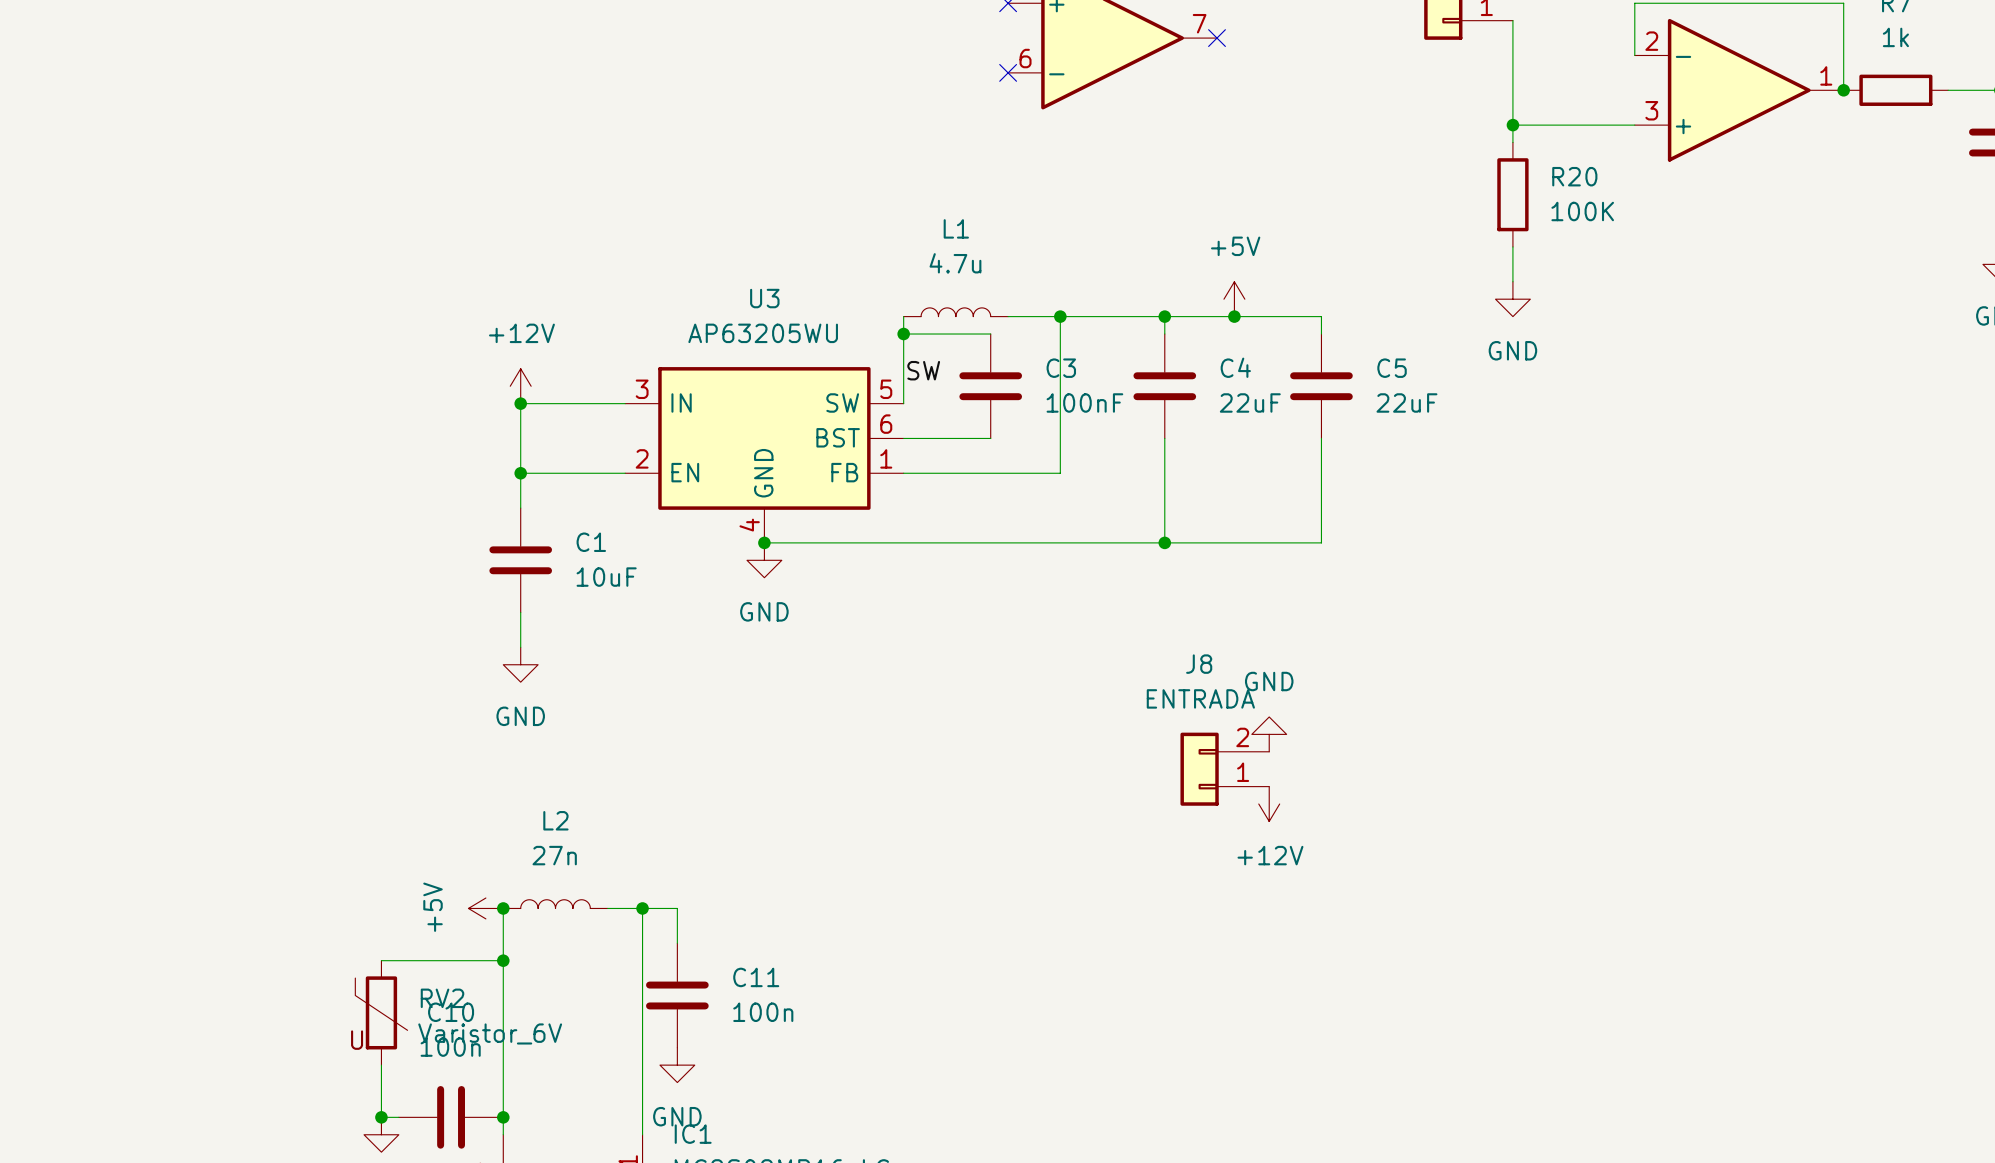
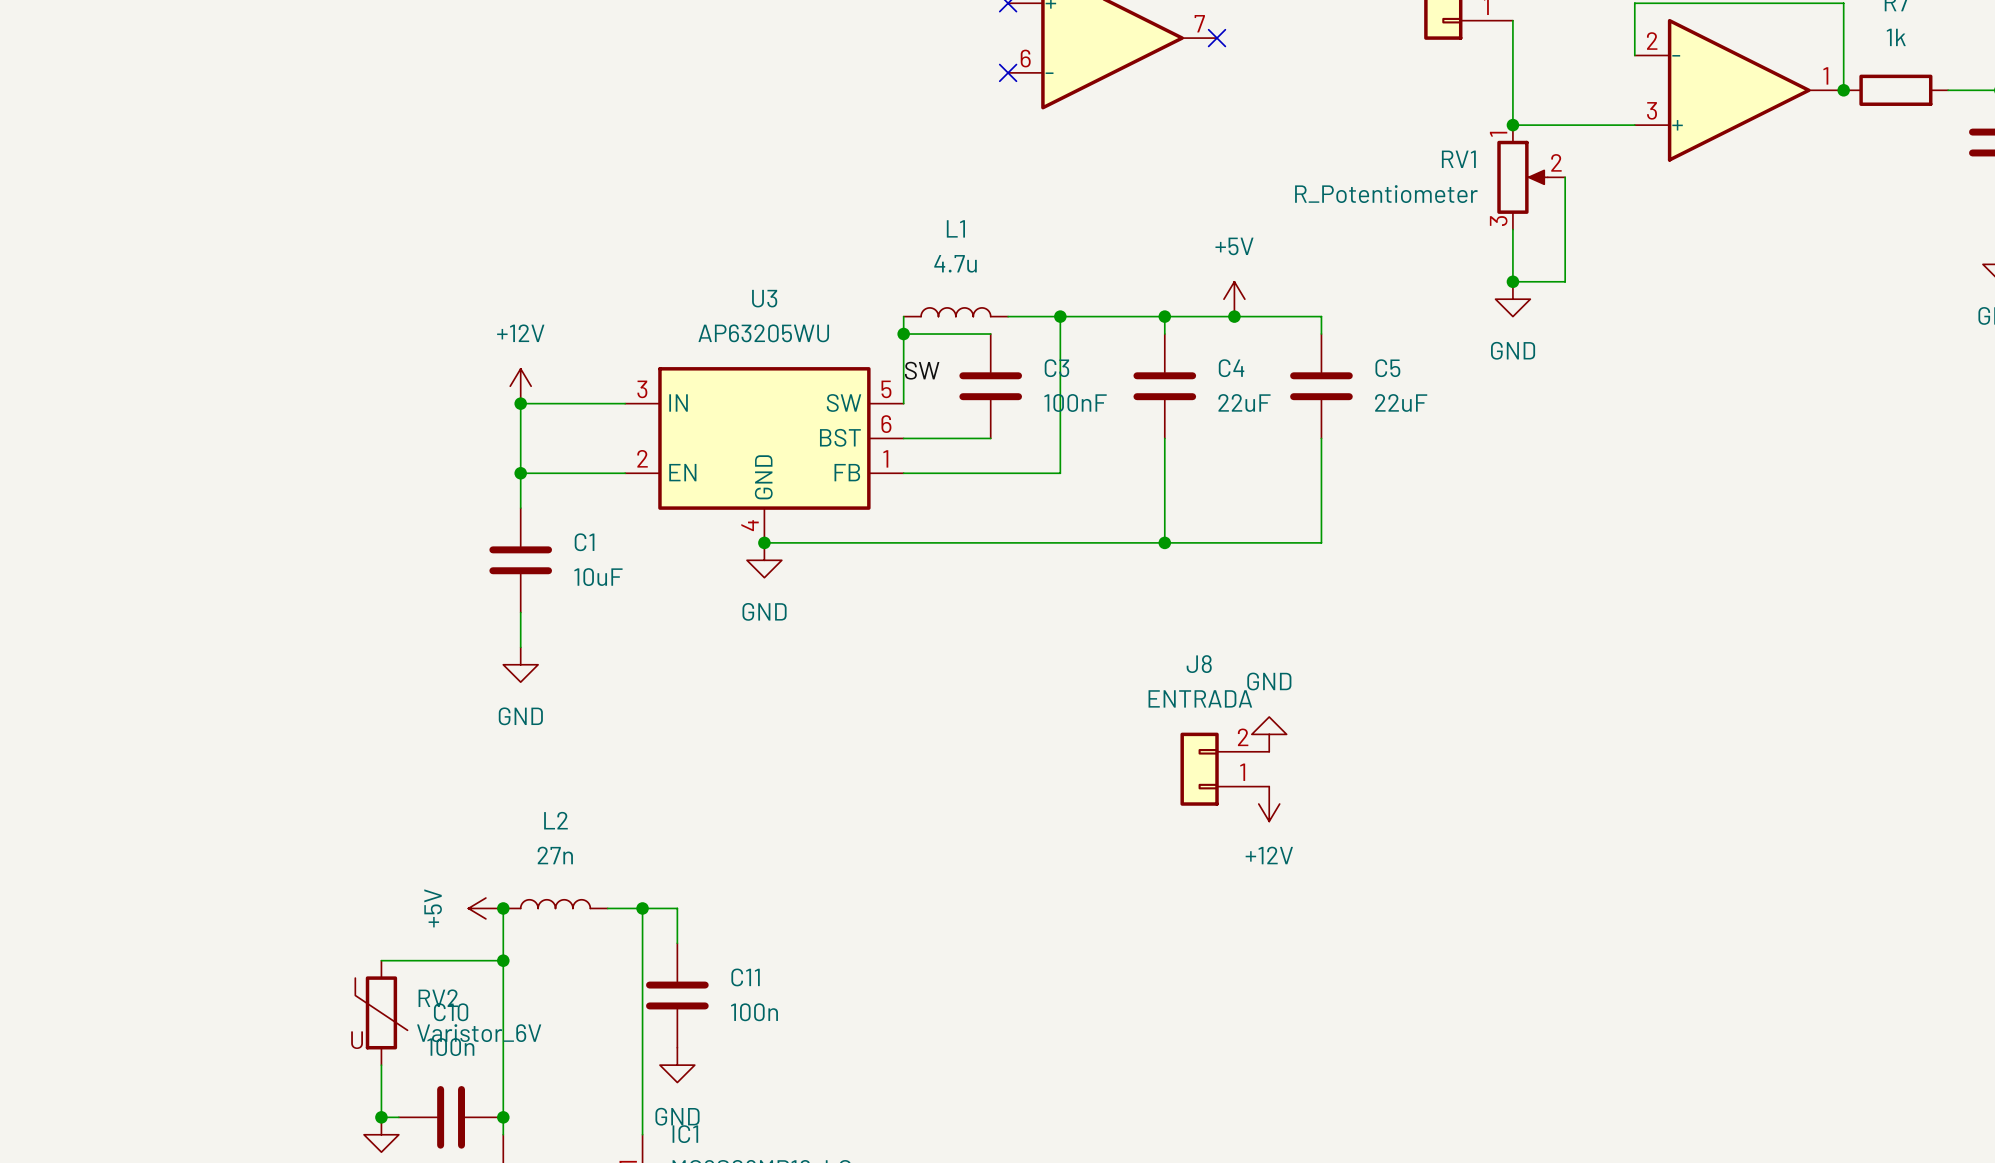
RV1: none -> R_Potentiometer (1531, 177)
wire: none -> (1565, 177) (1565, 281) (1512, 281)
R20: 100K (1512, 194) -> none
junction: none -> (1512, 281)

